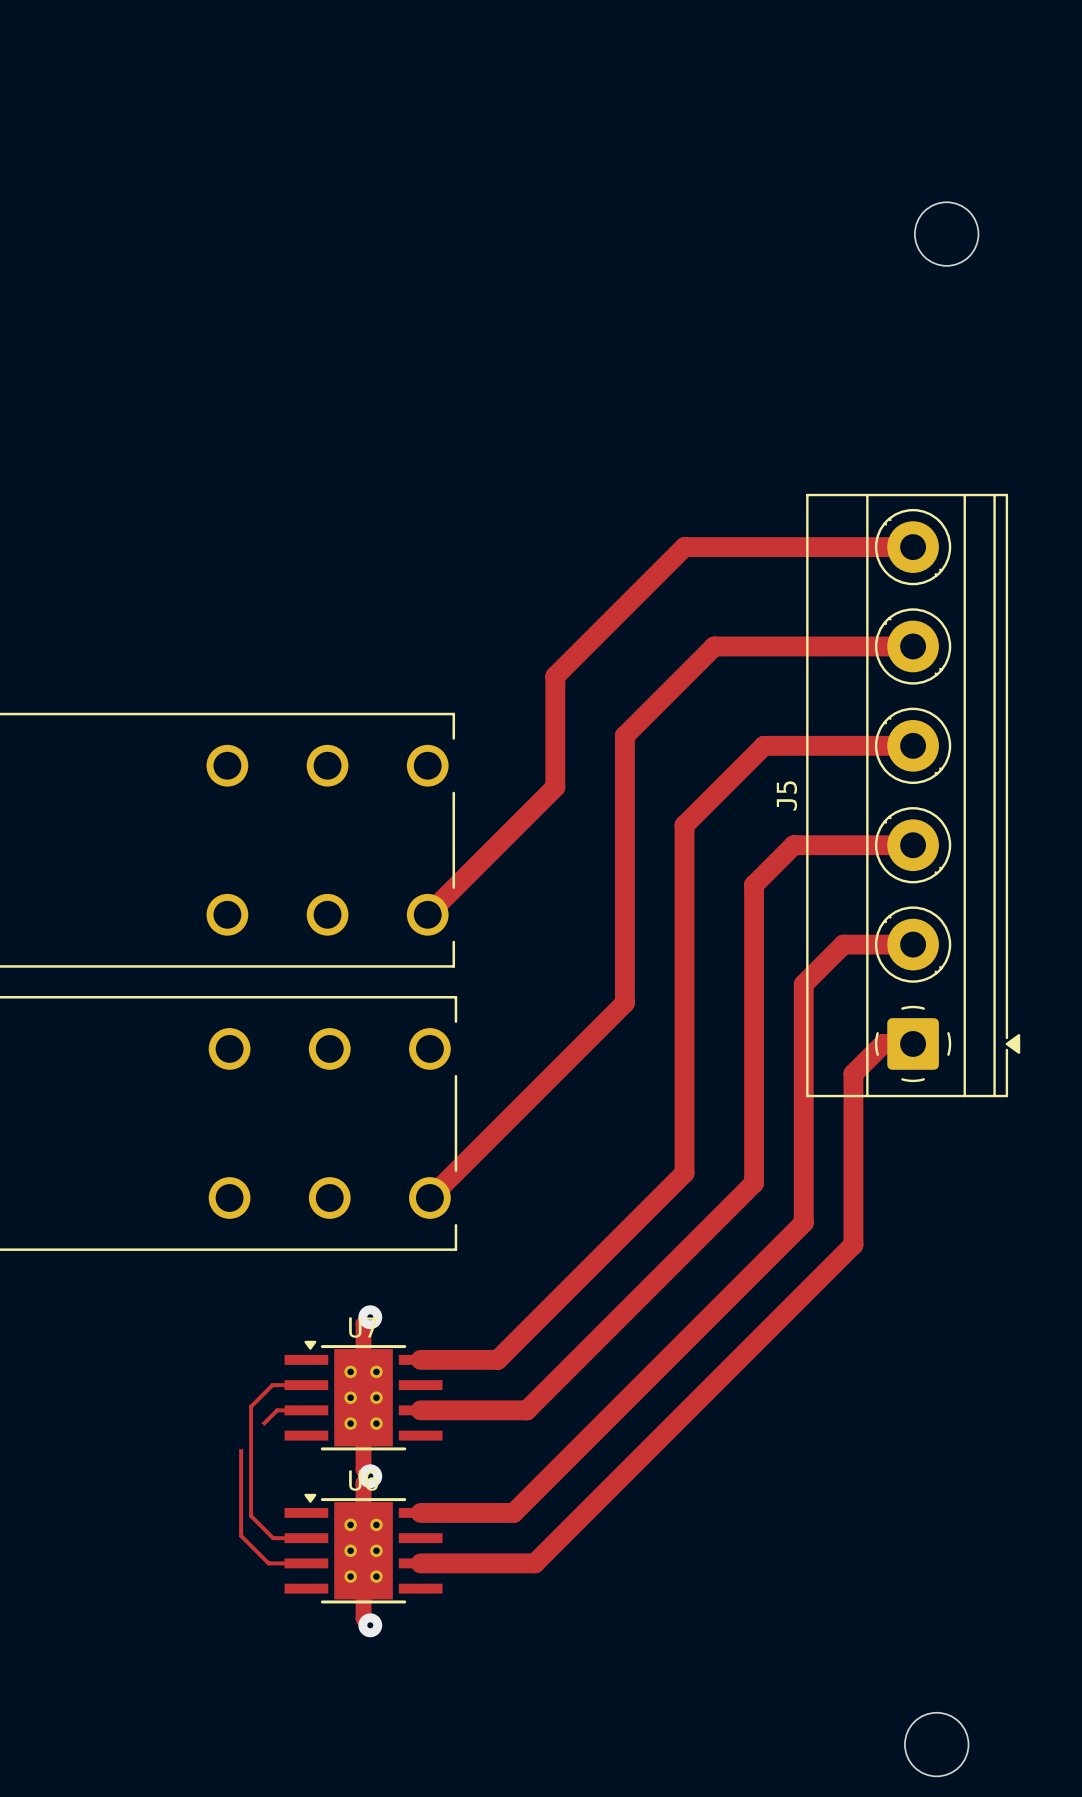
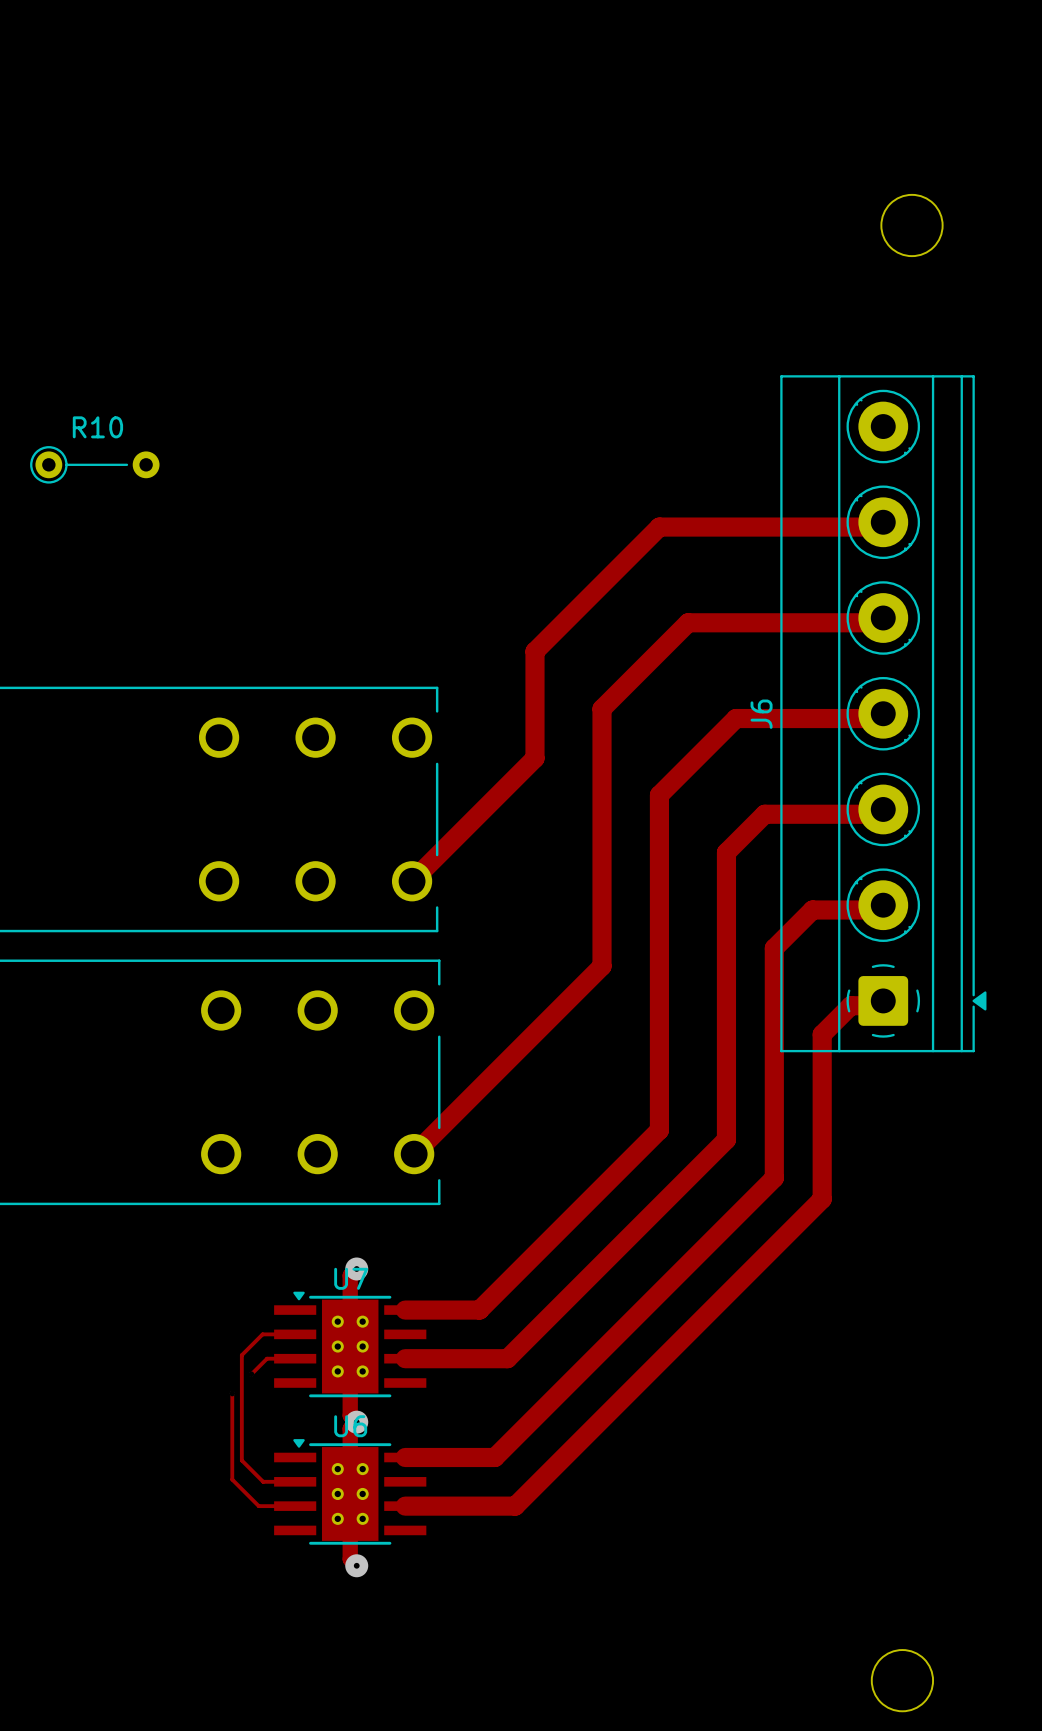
R10: none -> (94, 464)
J6: none -> (883, 713)
J5: (913, 795) -> none

